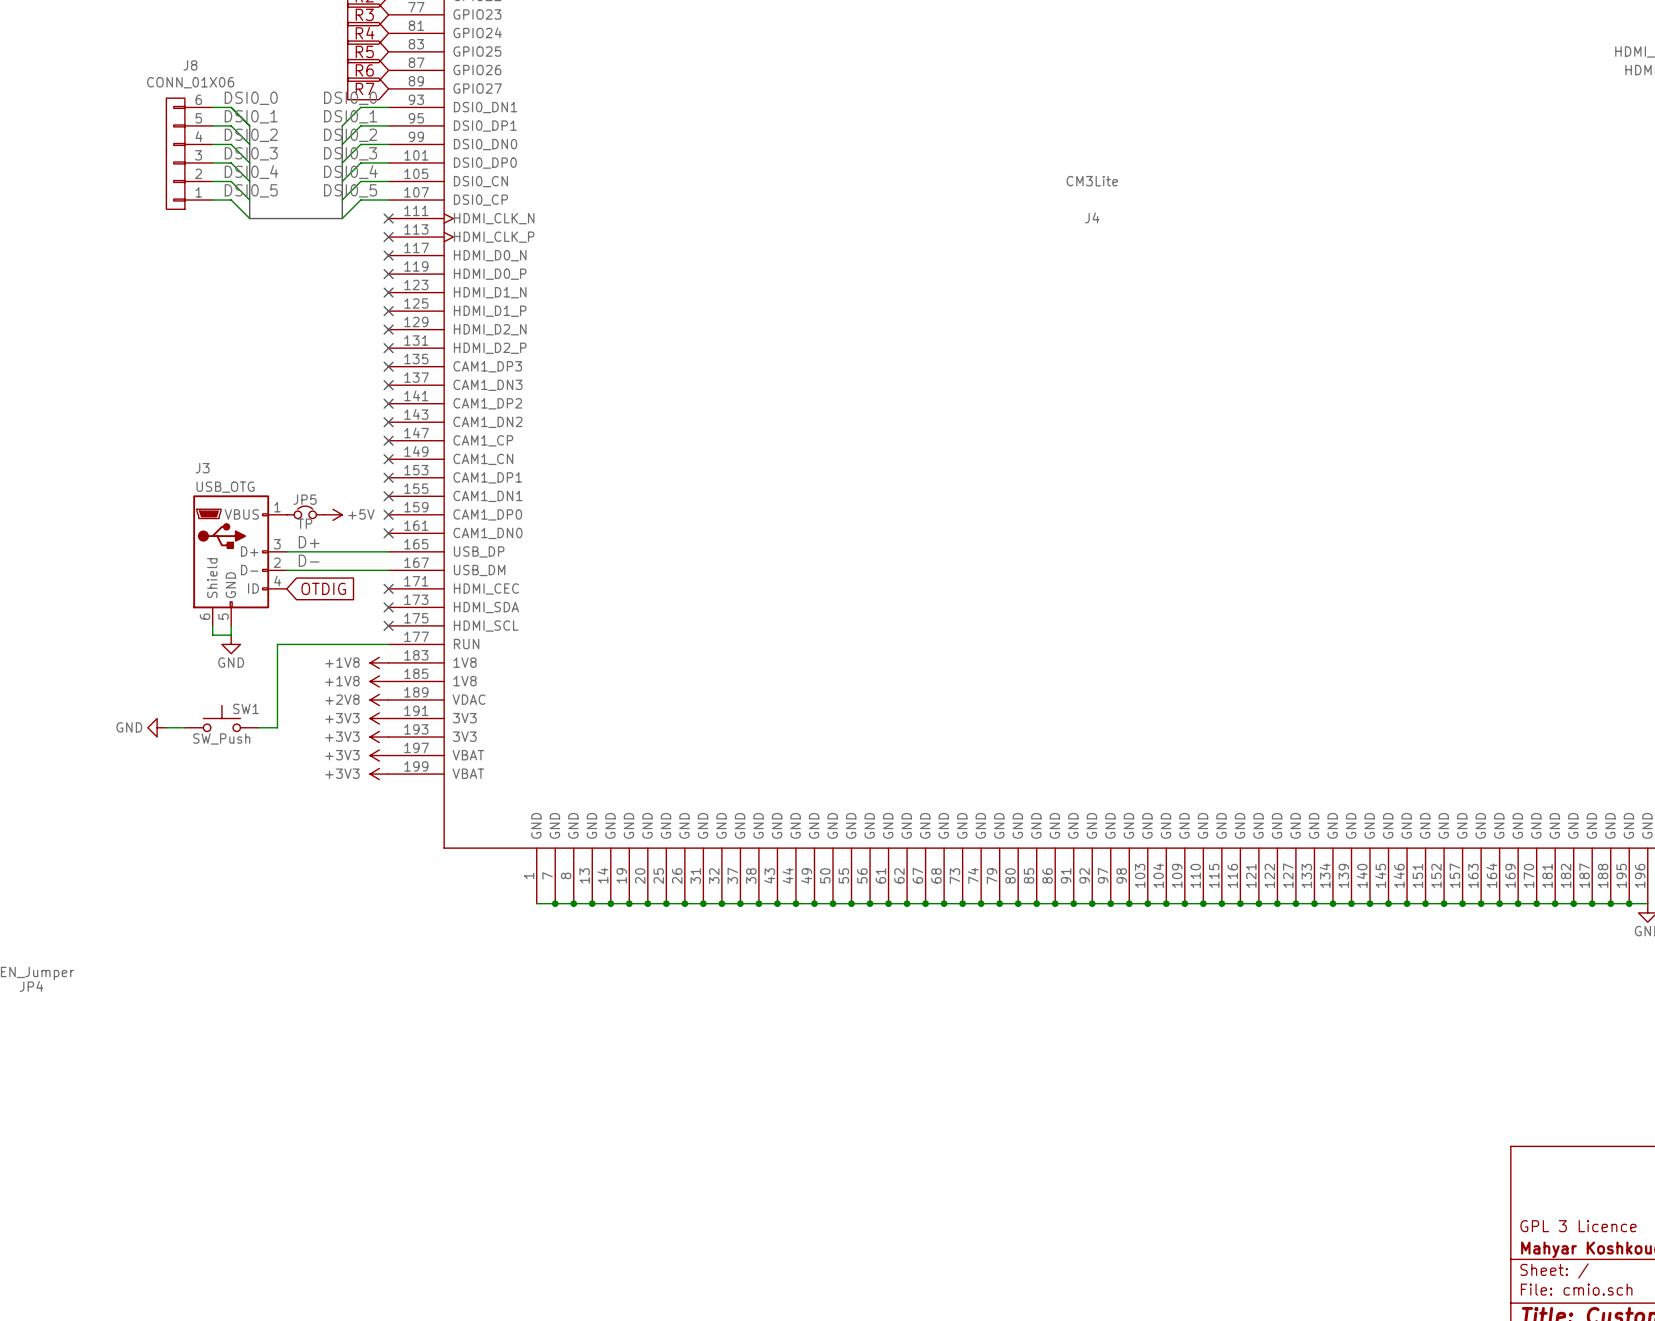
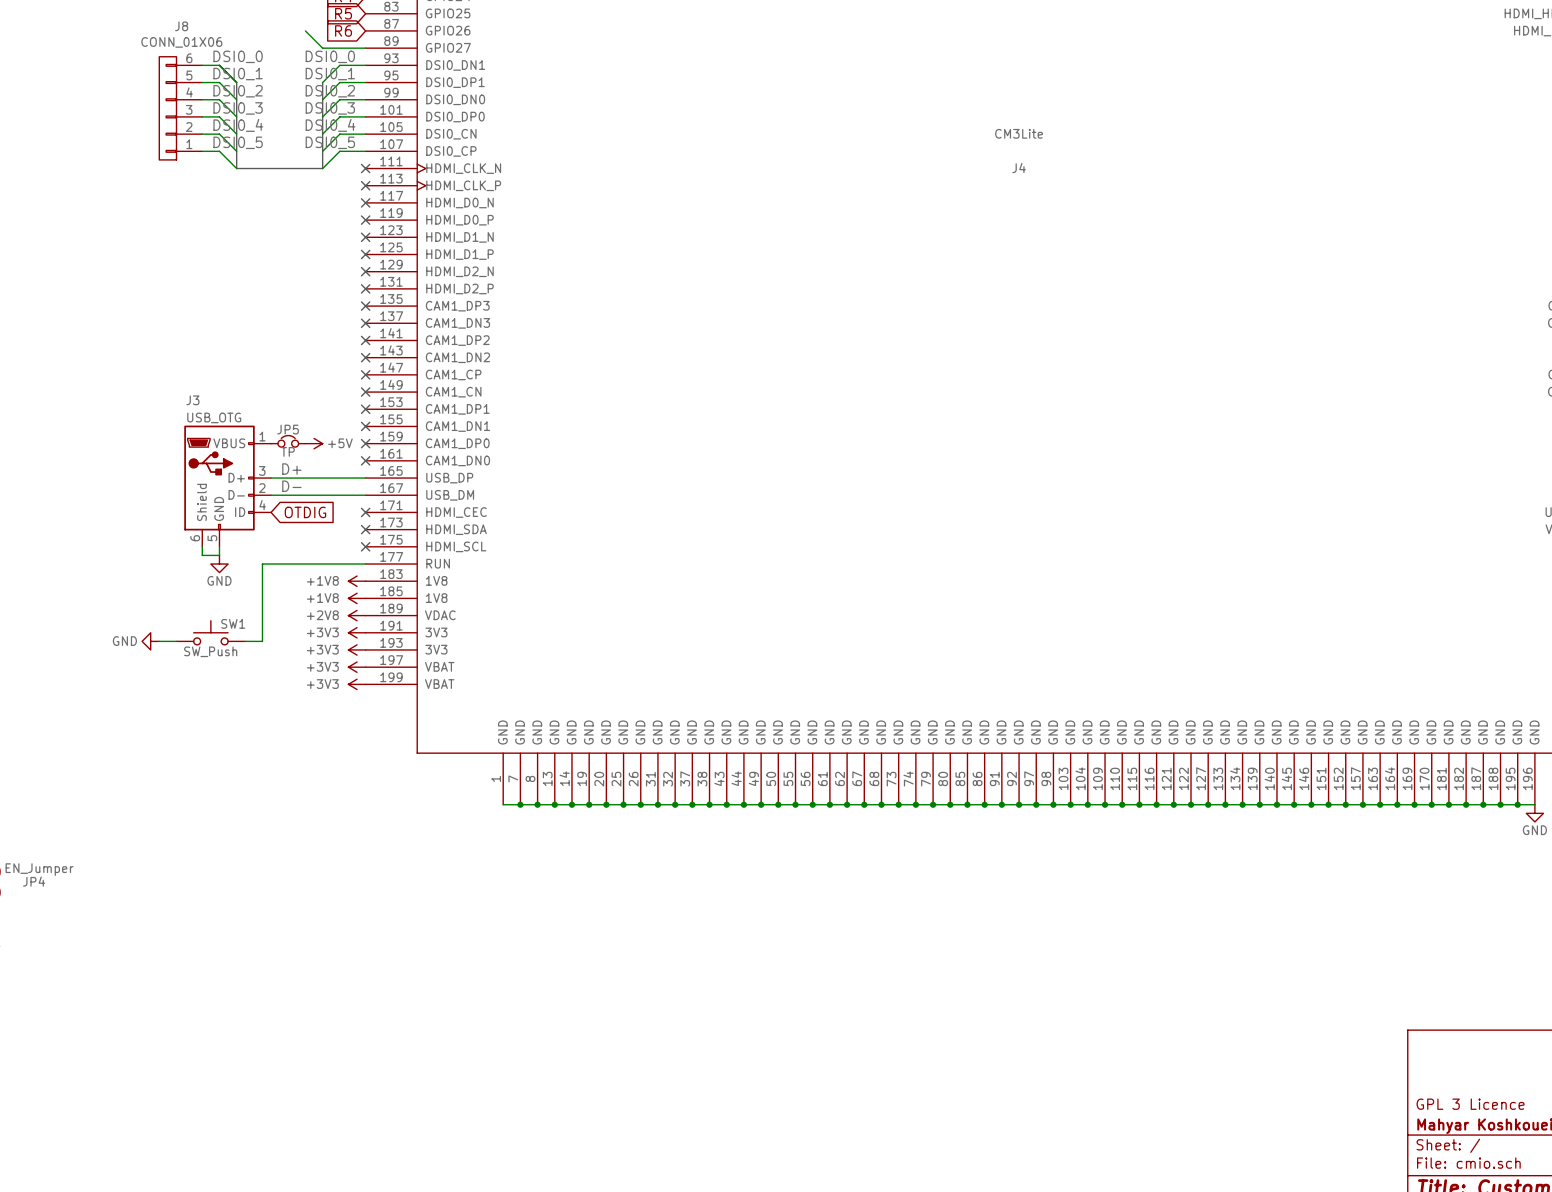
wire: none -> (305, 30) (322, 48) (365, 48)
global label: R7 (365, 88) -> none

